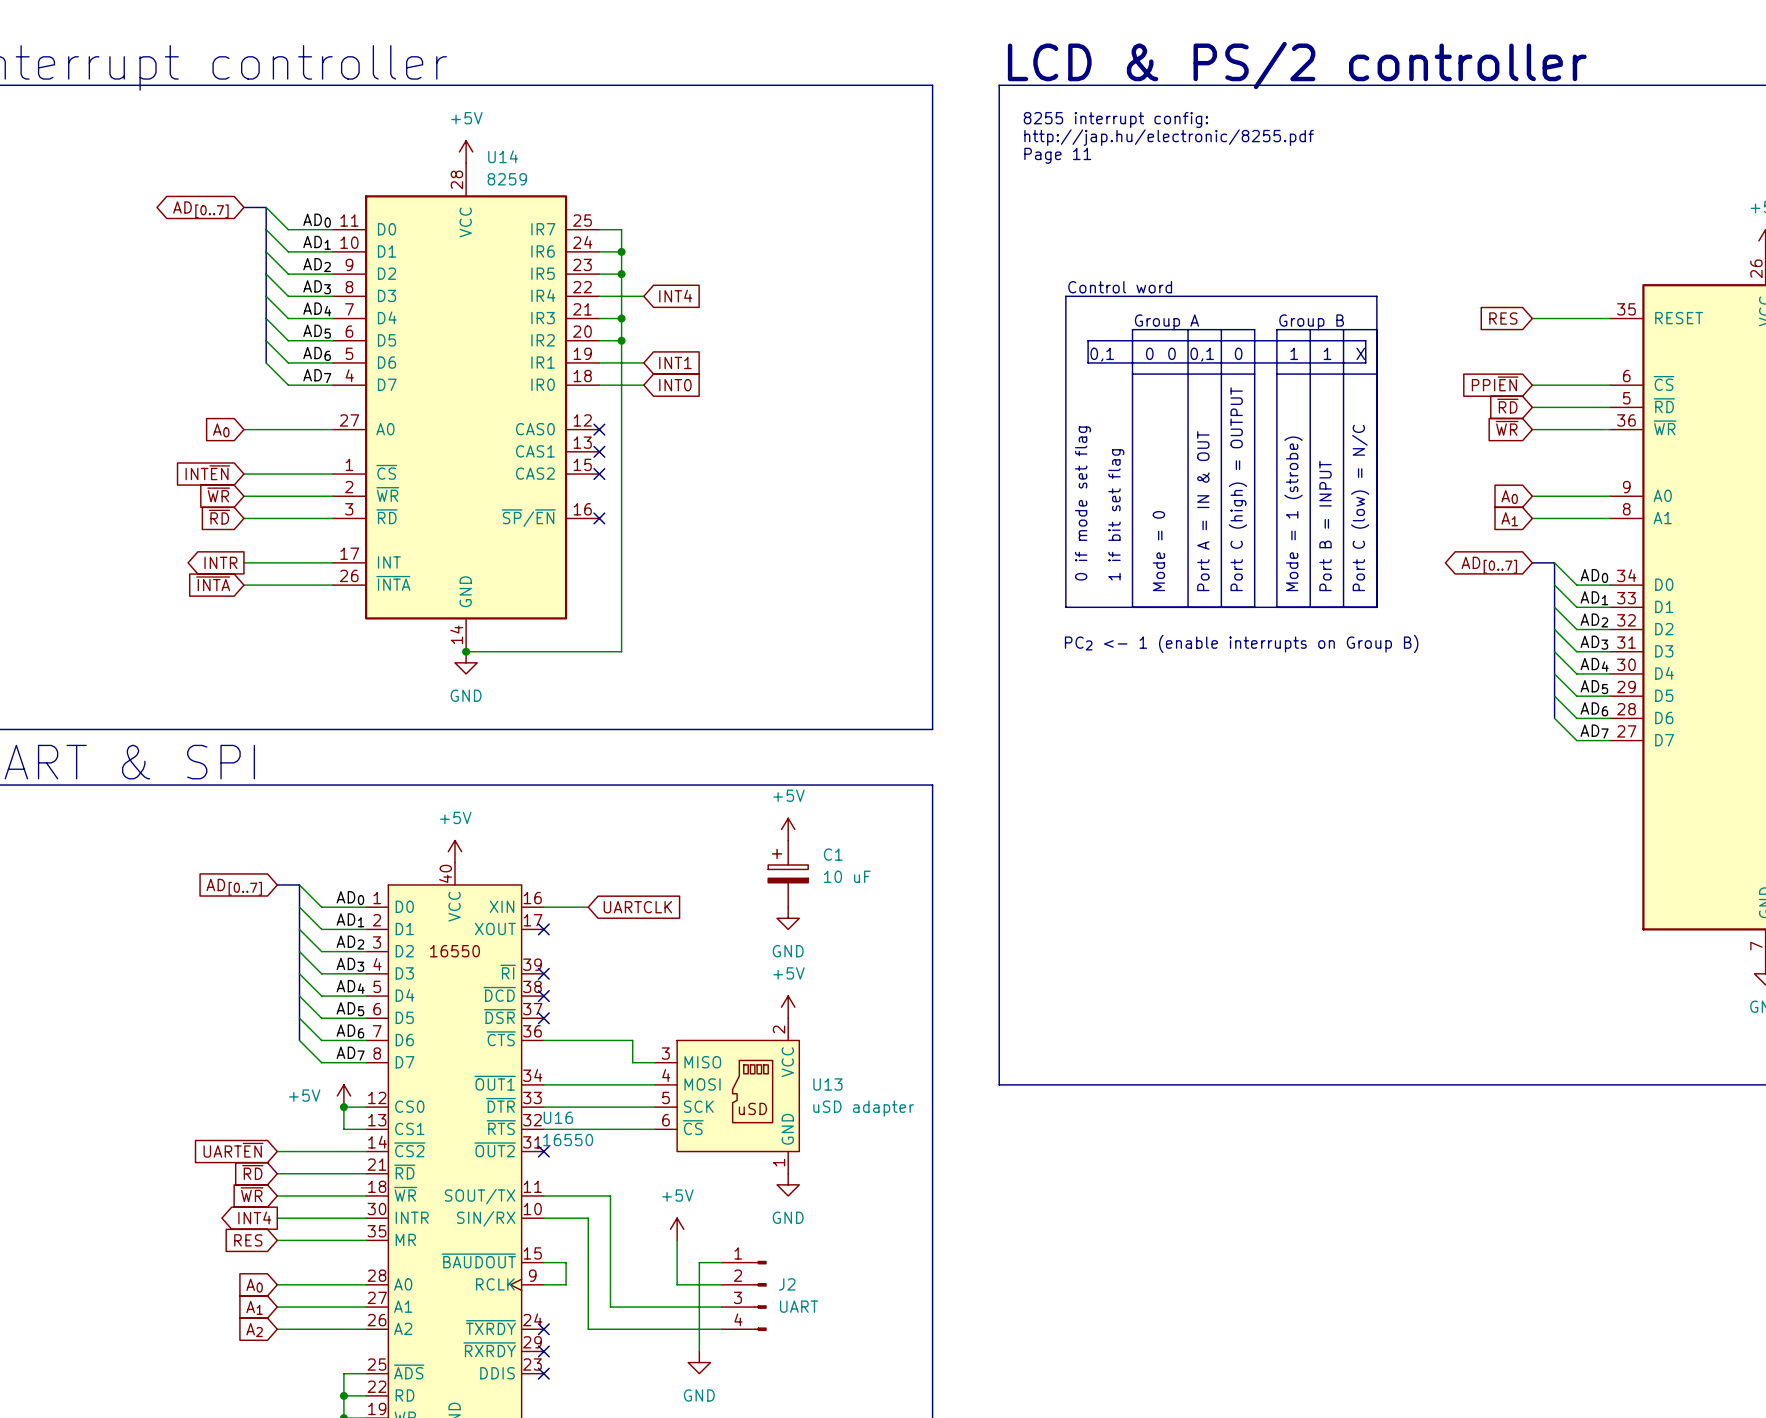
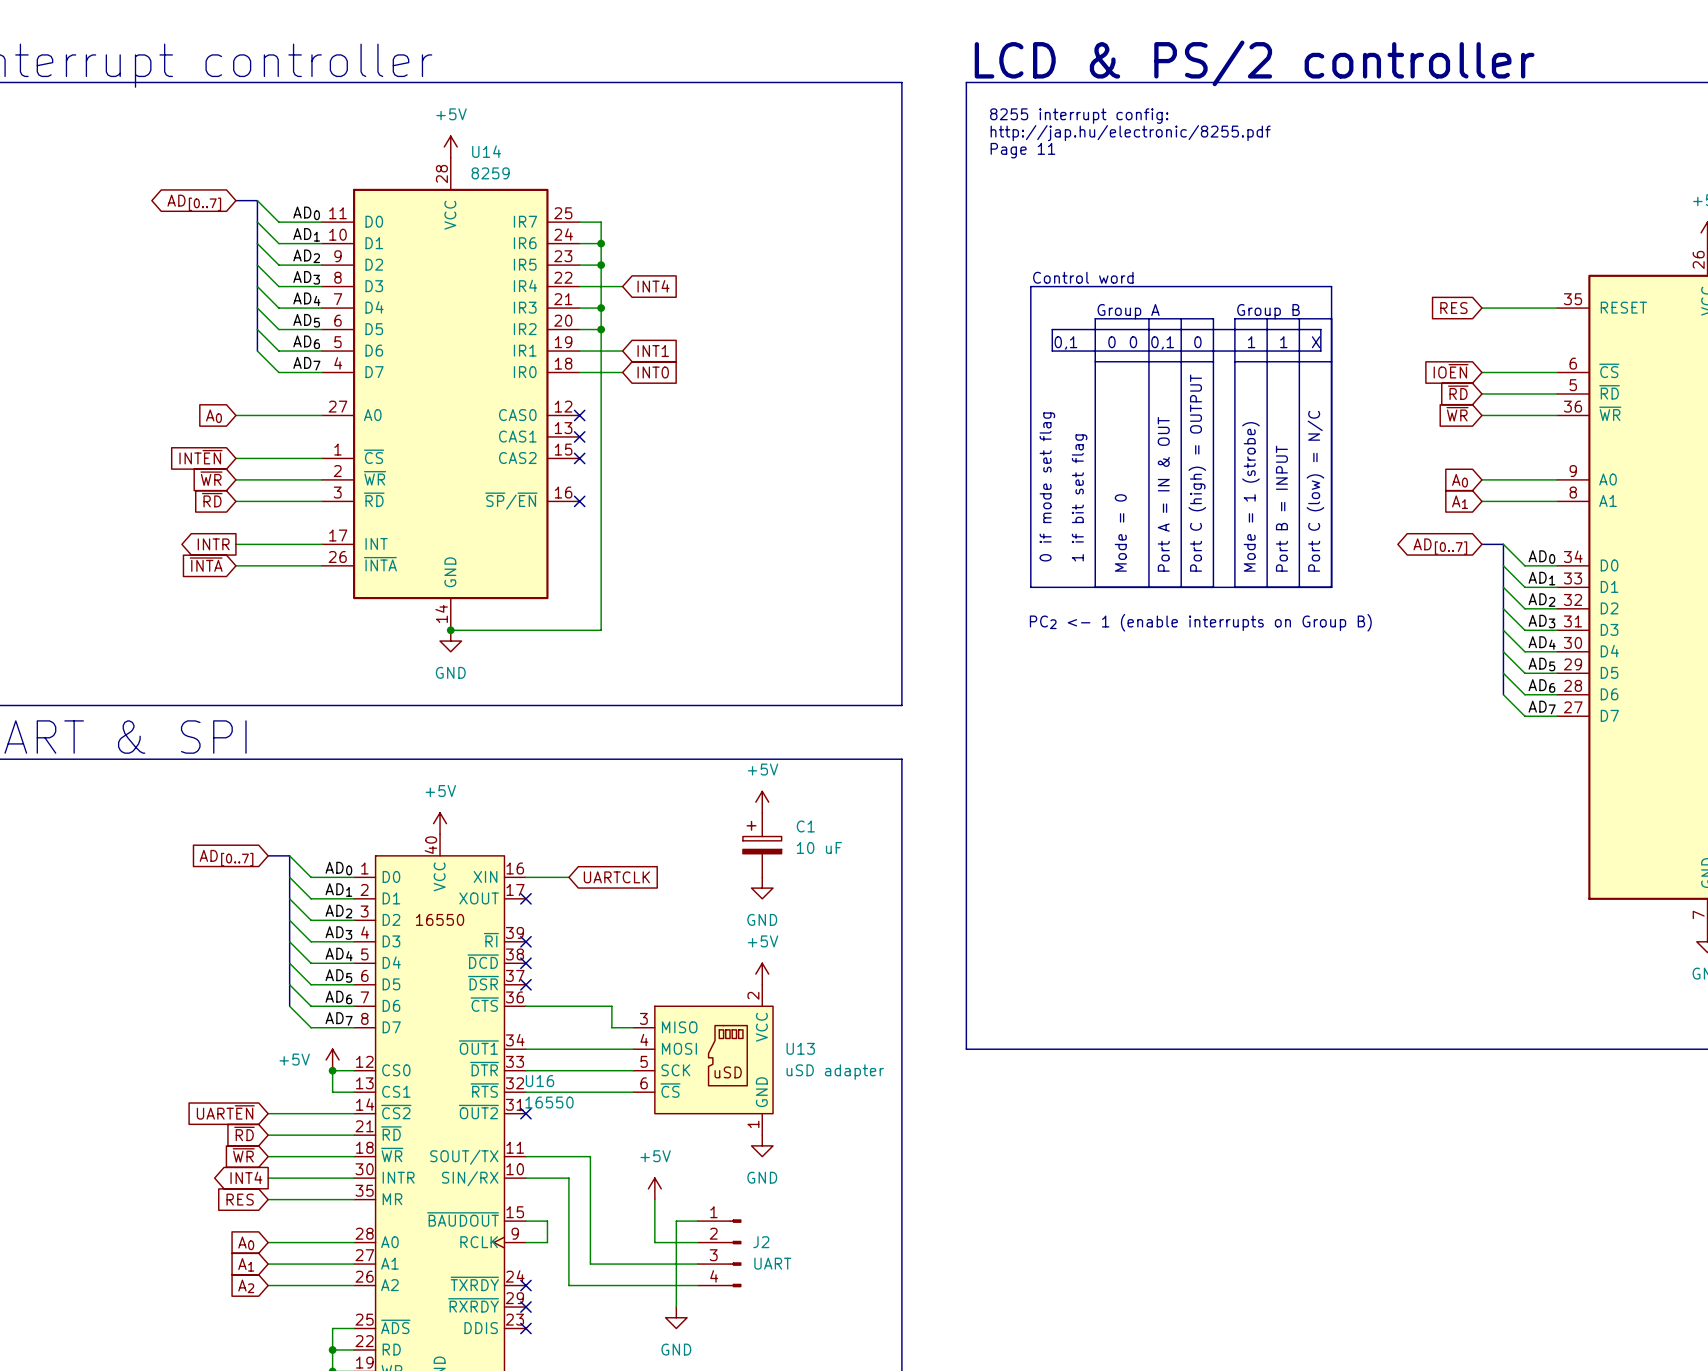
global label: PPI~{EN} (1495, 383) -> IO~{EN} (1451, 371)

